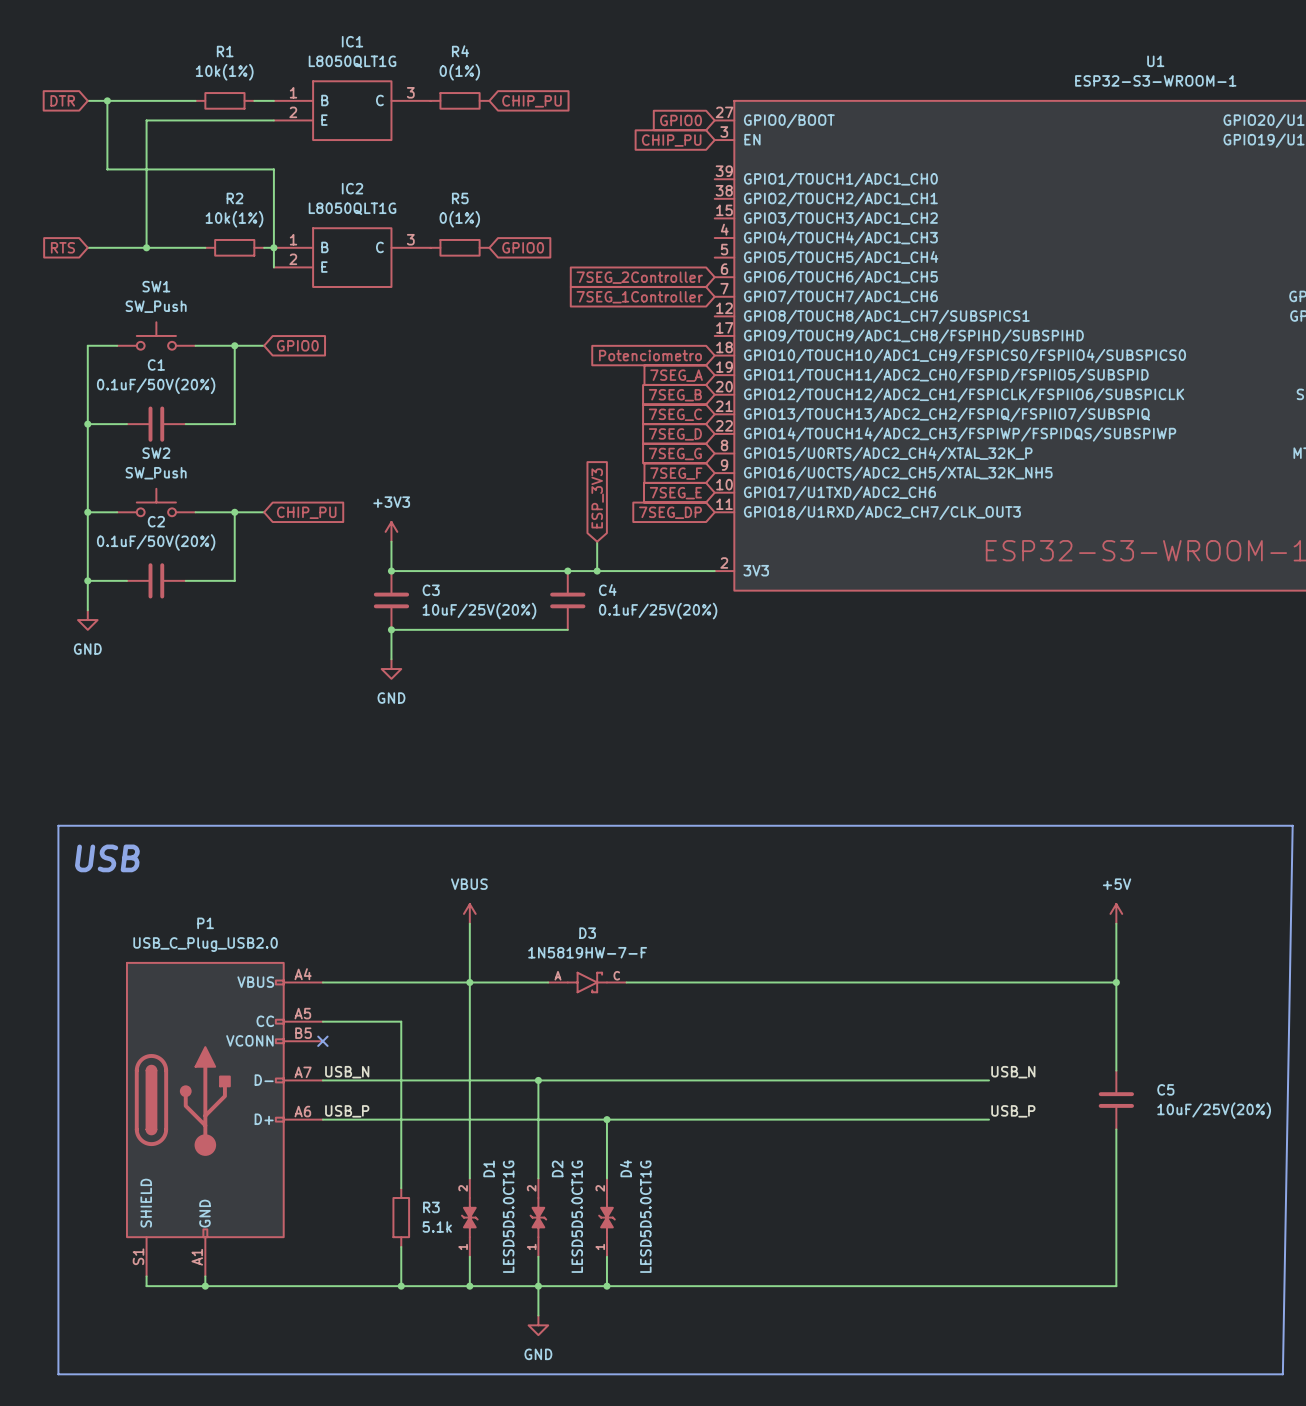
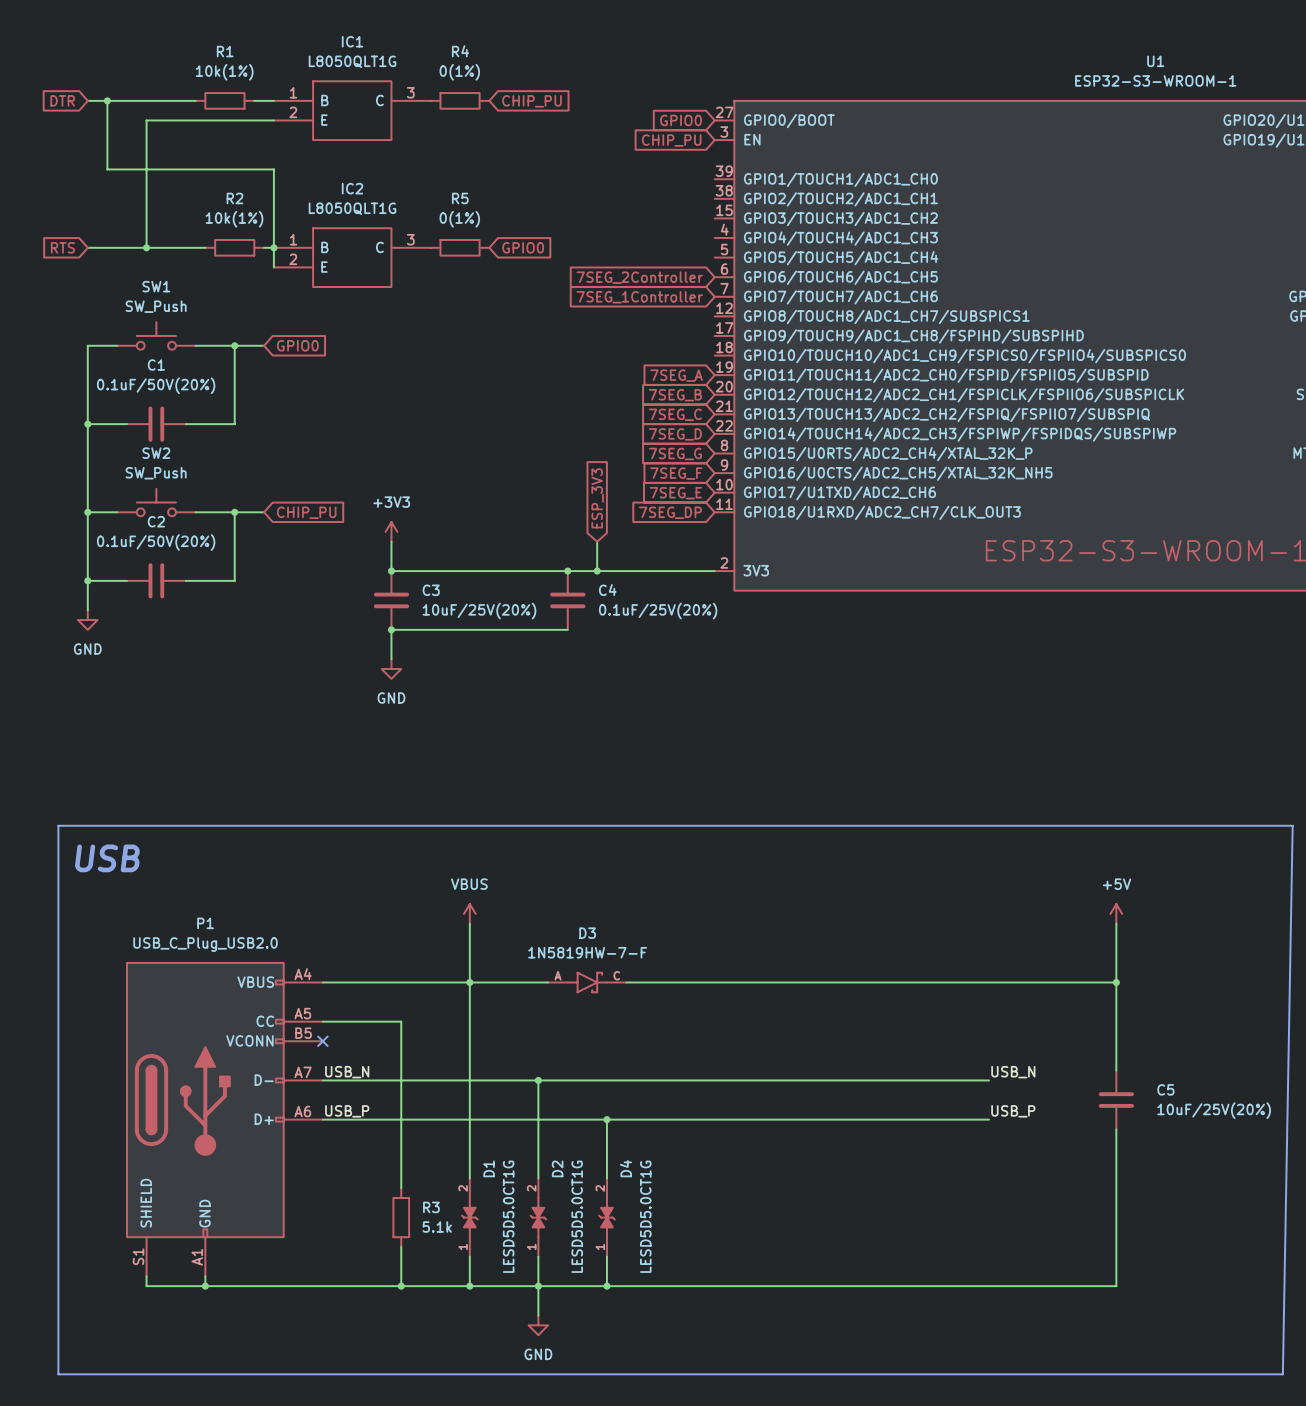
global label: Potenciometro (650, 355) -> none

